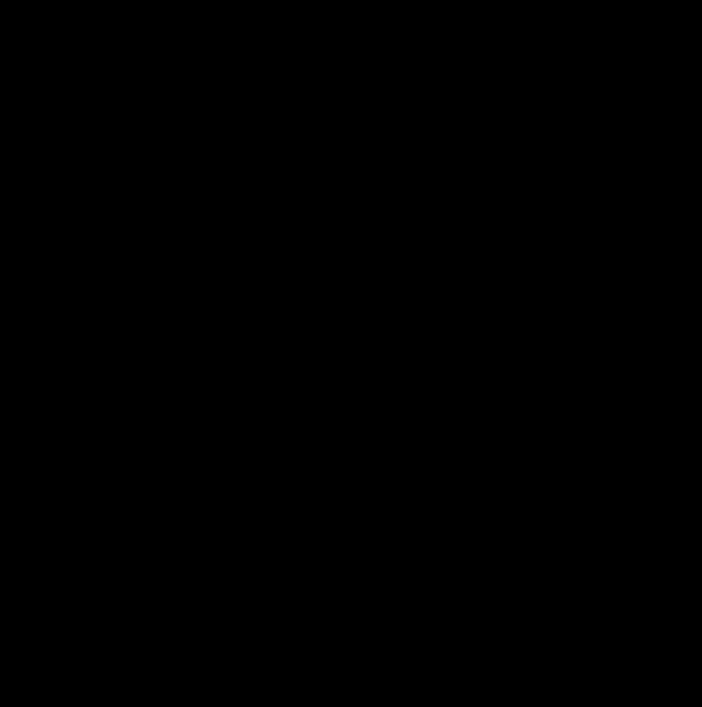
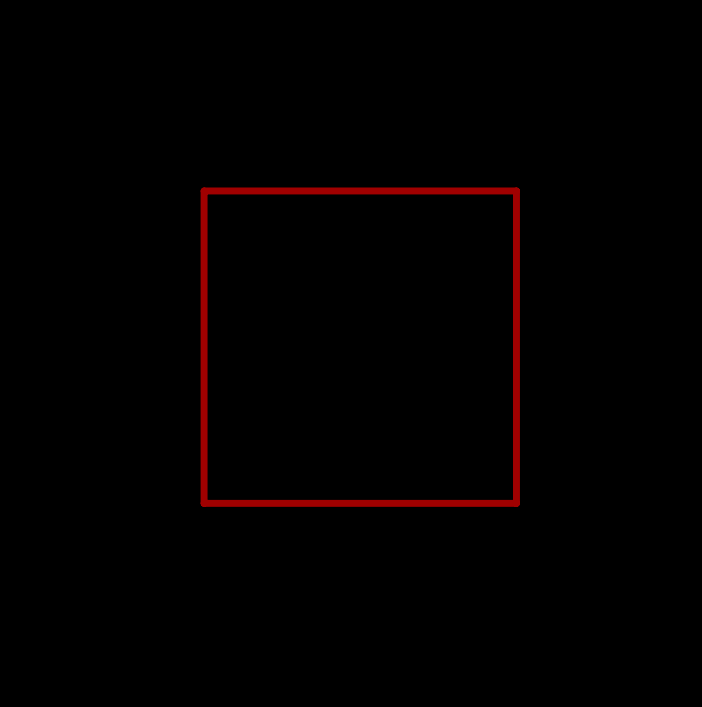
track: none -> (204, 190) (516, 190) (516, 503) (204, 503) (204, 190)

